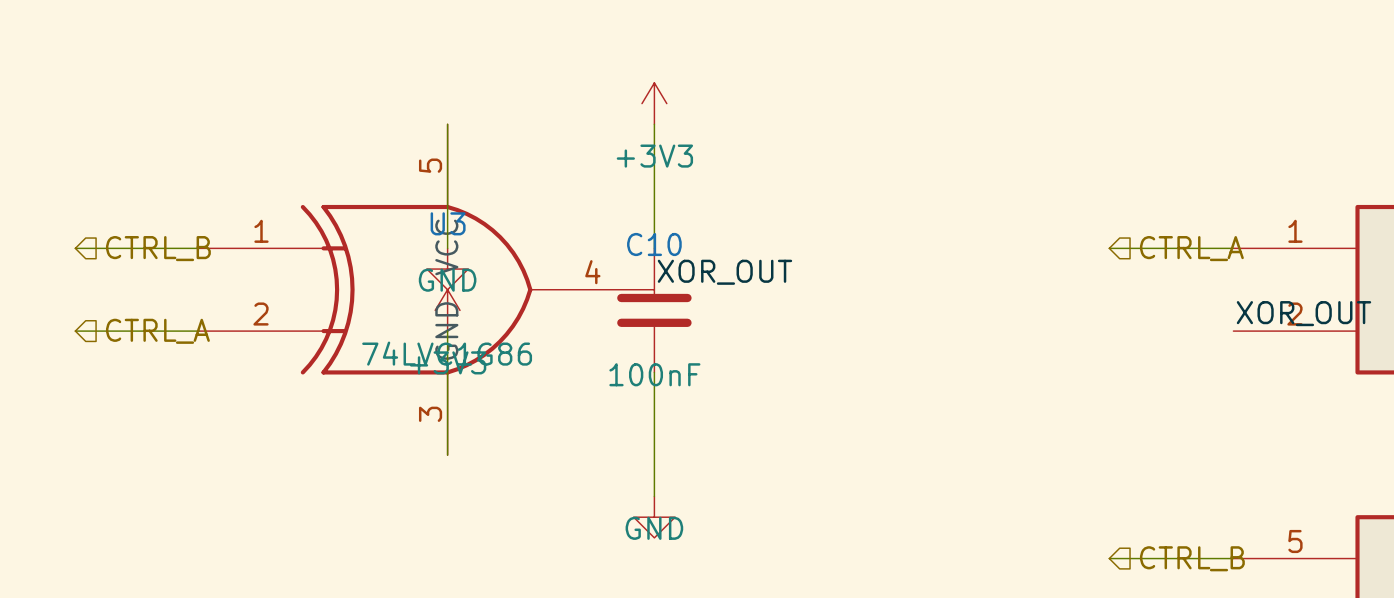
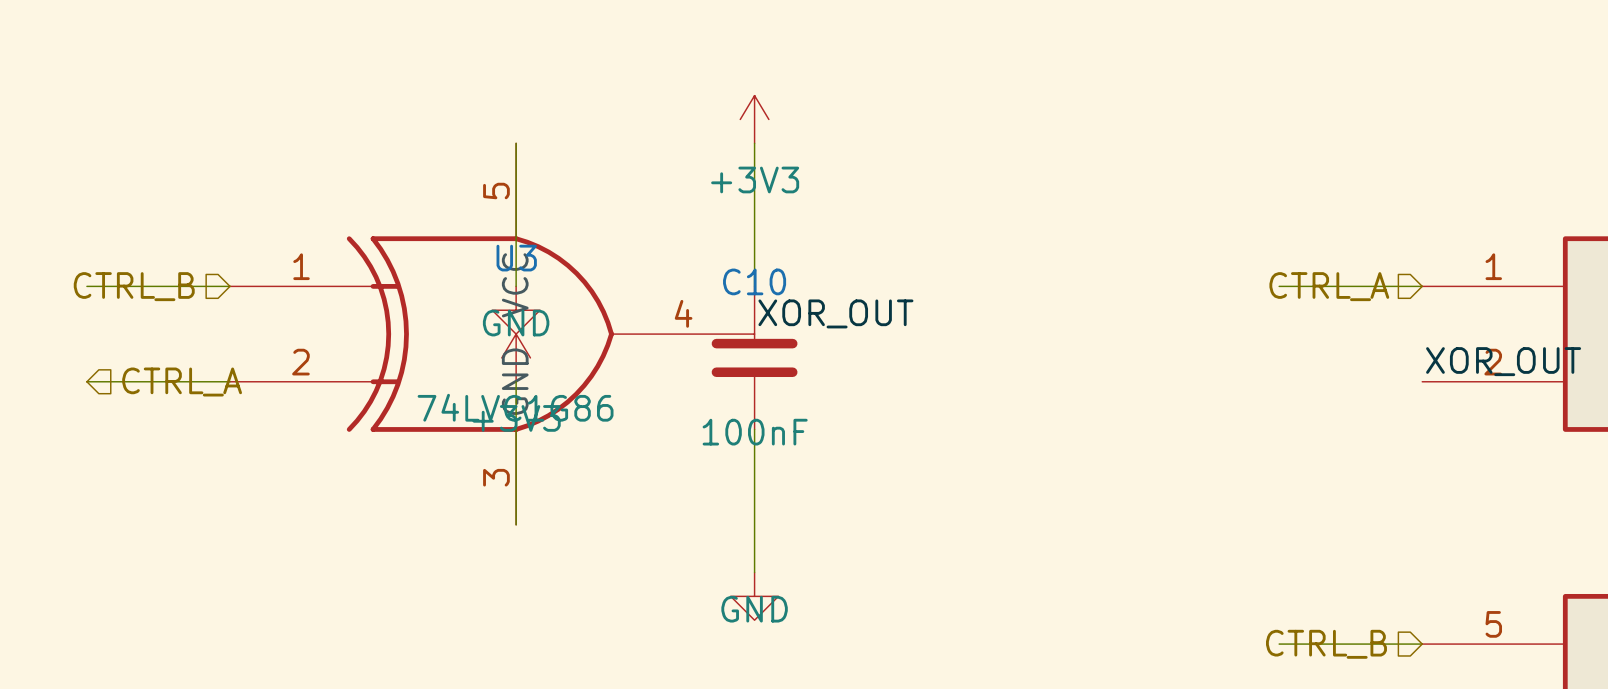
hierarchical label rotation: 0° (158, 248) -> 180° (134, 286)
hierarchical label rotation: 0° (1191, 248) -> 180° (1329, 286)
hierarchical label rotation: 0° (1192, 558) -> 180° (1326, 644)

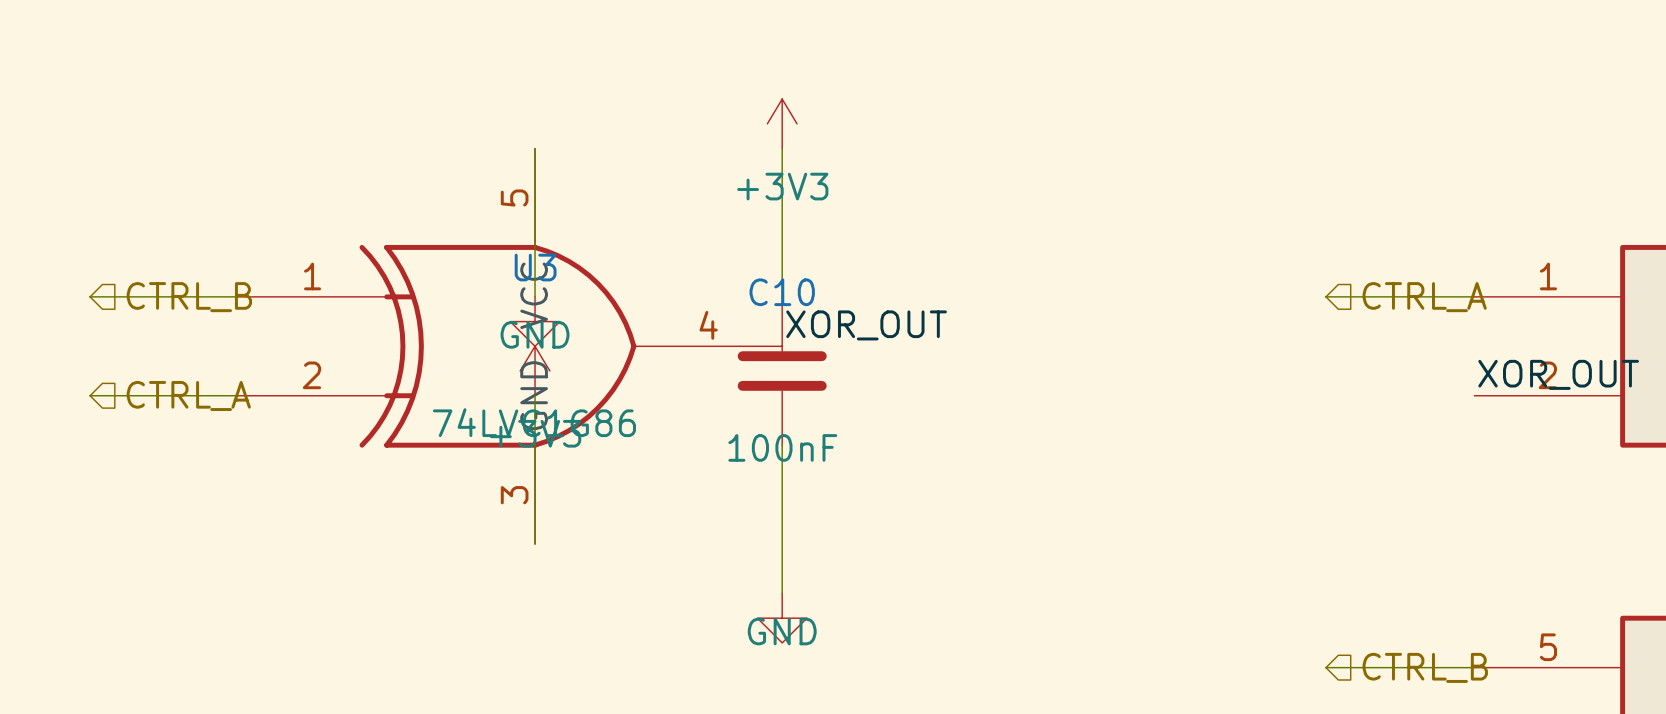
hierarchical label rotation: 0° (134, 286) -> 180° (189, 297)
hierarchical label rotation: 0° (1329, 286) -> 180° (1424, 297)
hierarchical label rotation: 0° (1326, 644) -> 180° (1425, 667)

